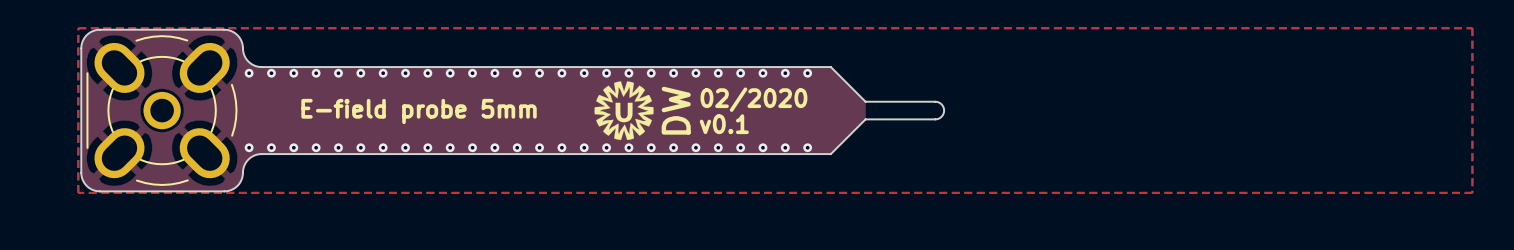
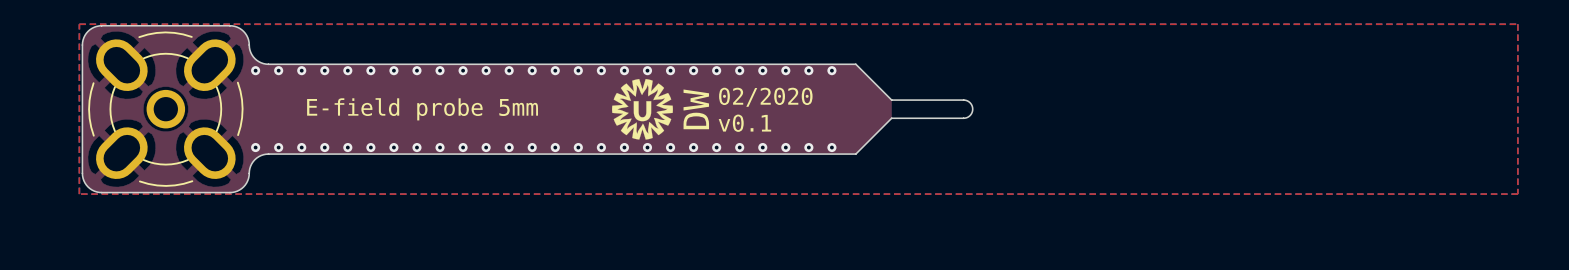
part footprint: [86, 35, 238, 186] -> [88, 31, 244, 187]

